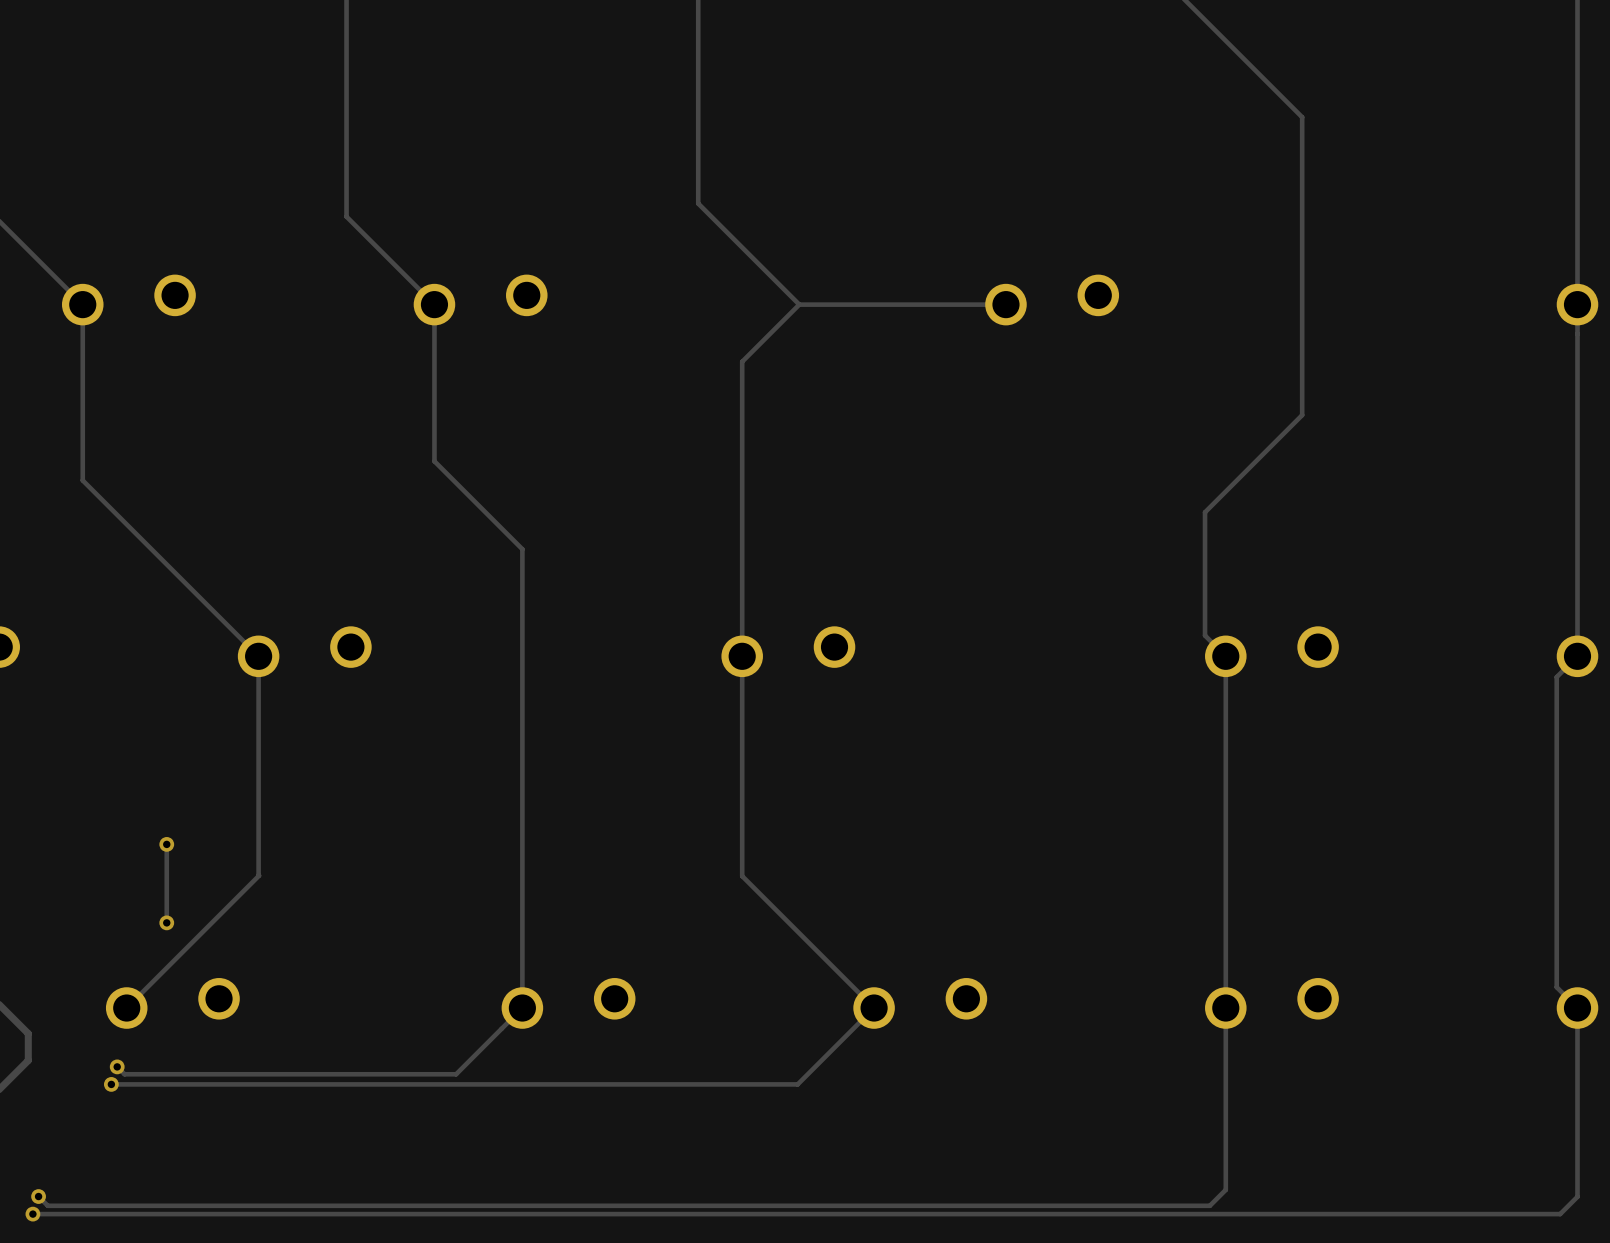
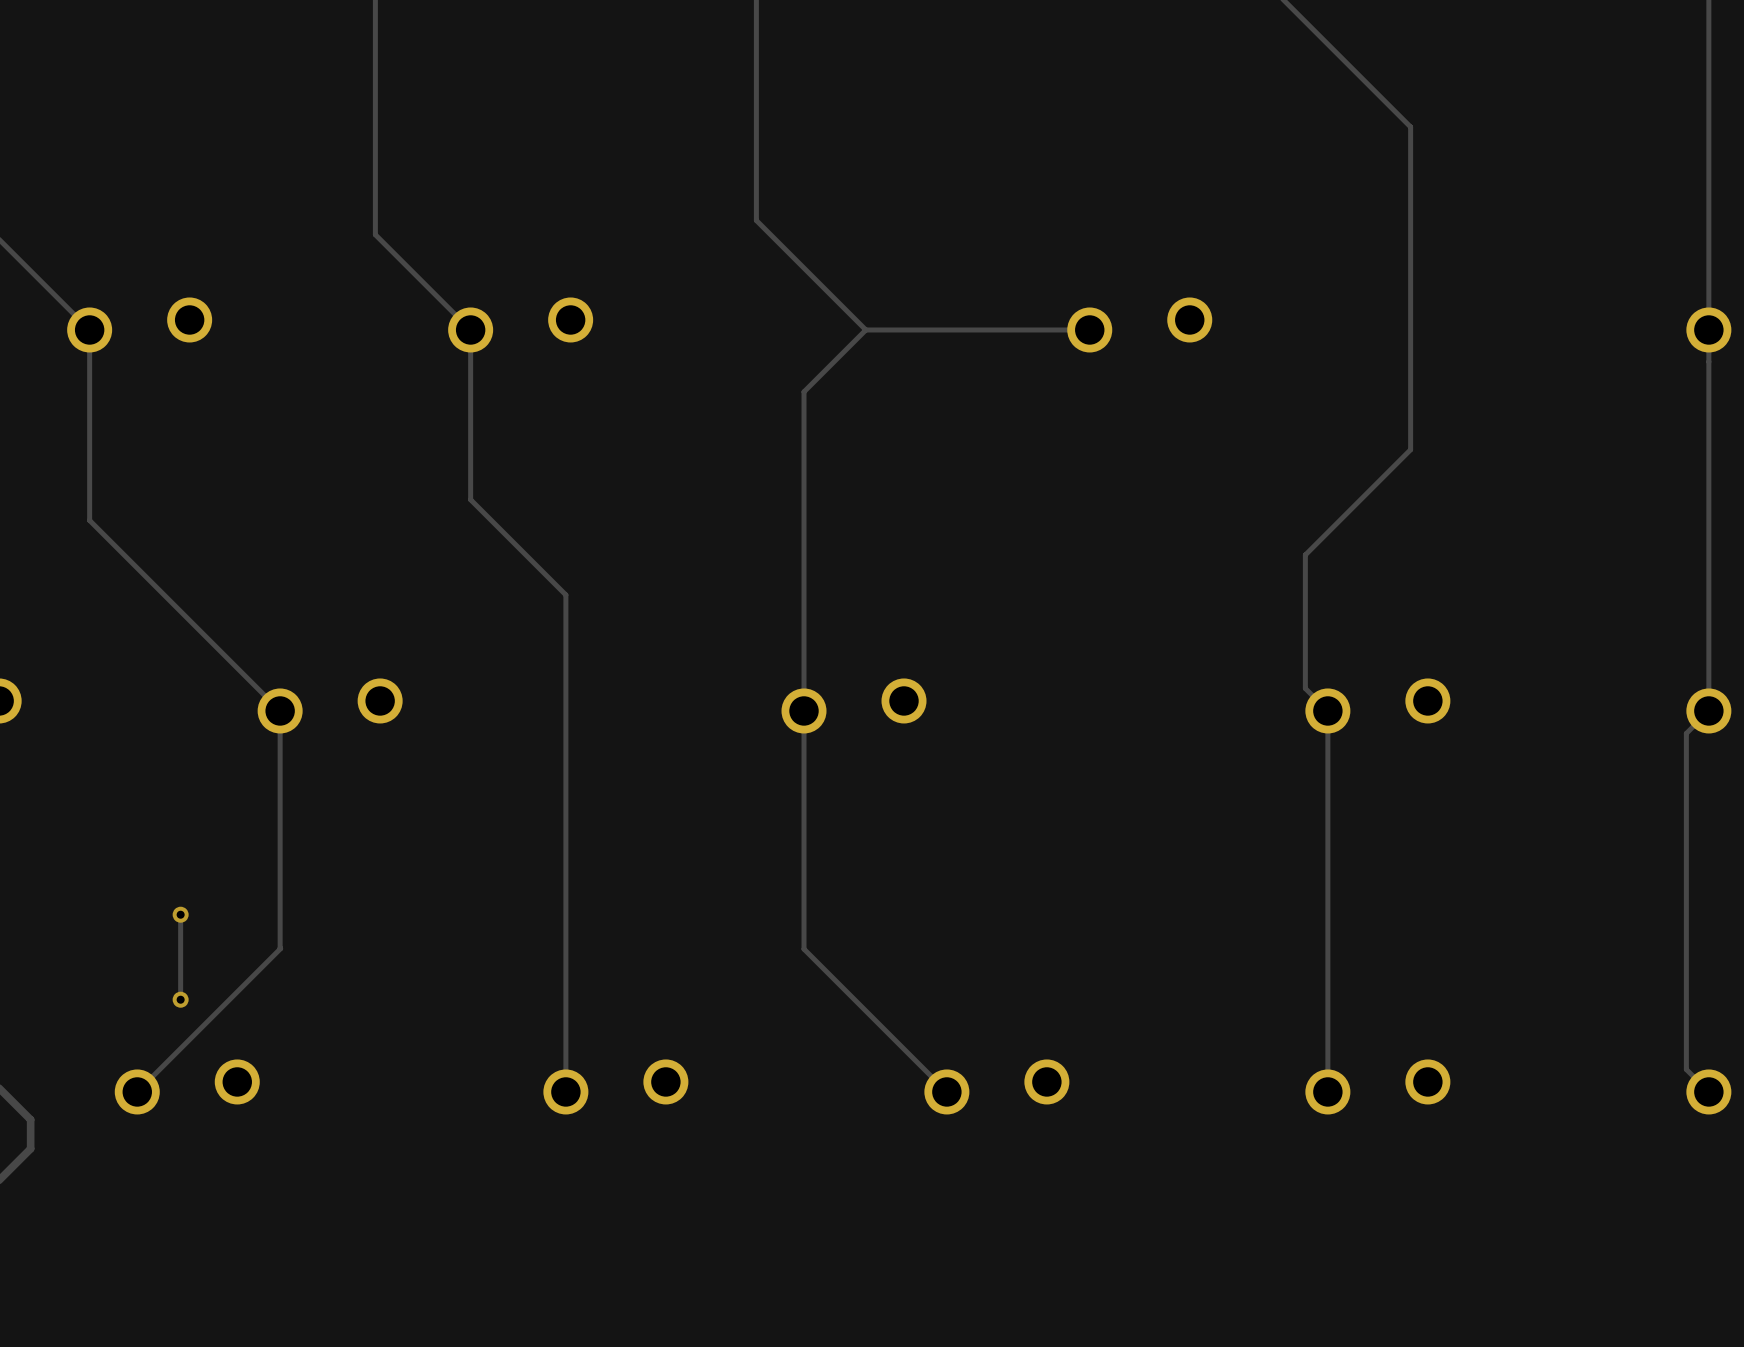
track: (522, 1008) (456, 1074) (124, 1074) (117, 1066) -> none
track: (874, 1008) (797, 1084) (111, 1084) -> none
track: (1225, 1008) (1225, 1189) (1209, 1205) (47, 1205) (38, 1196) -> none
track: (1577, 1008) (1577, 1196) (1560, 1214) (32, 1214) -> none
via: (117, 1066) -> none
via: (111, 1084) -> none
via: (38, 1196) -> none
via: (32, 1214) -> none

